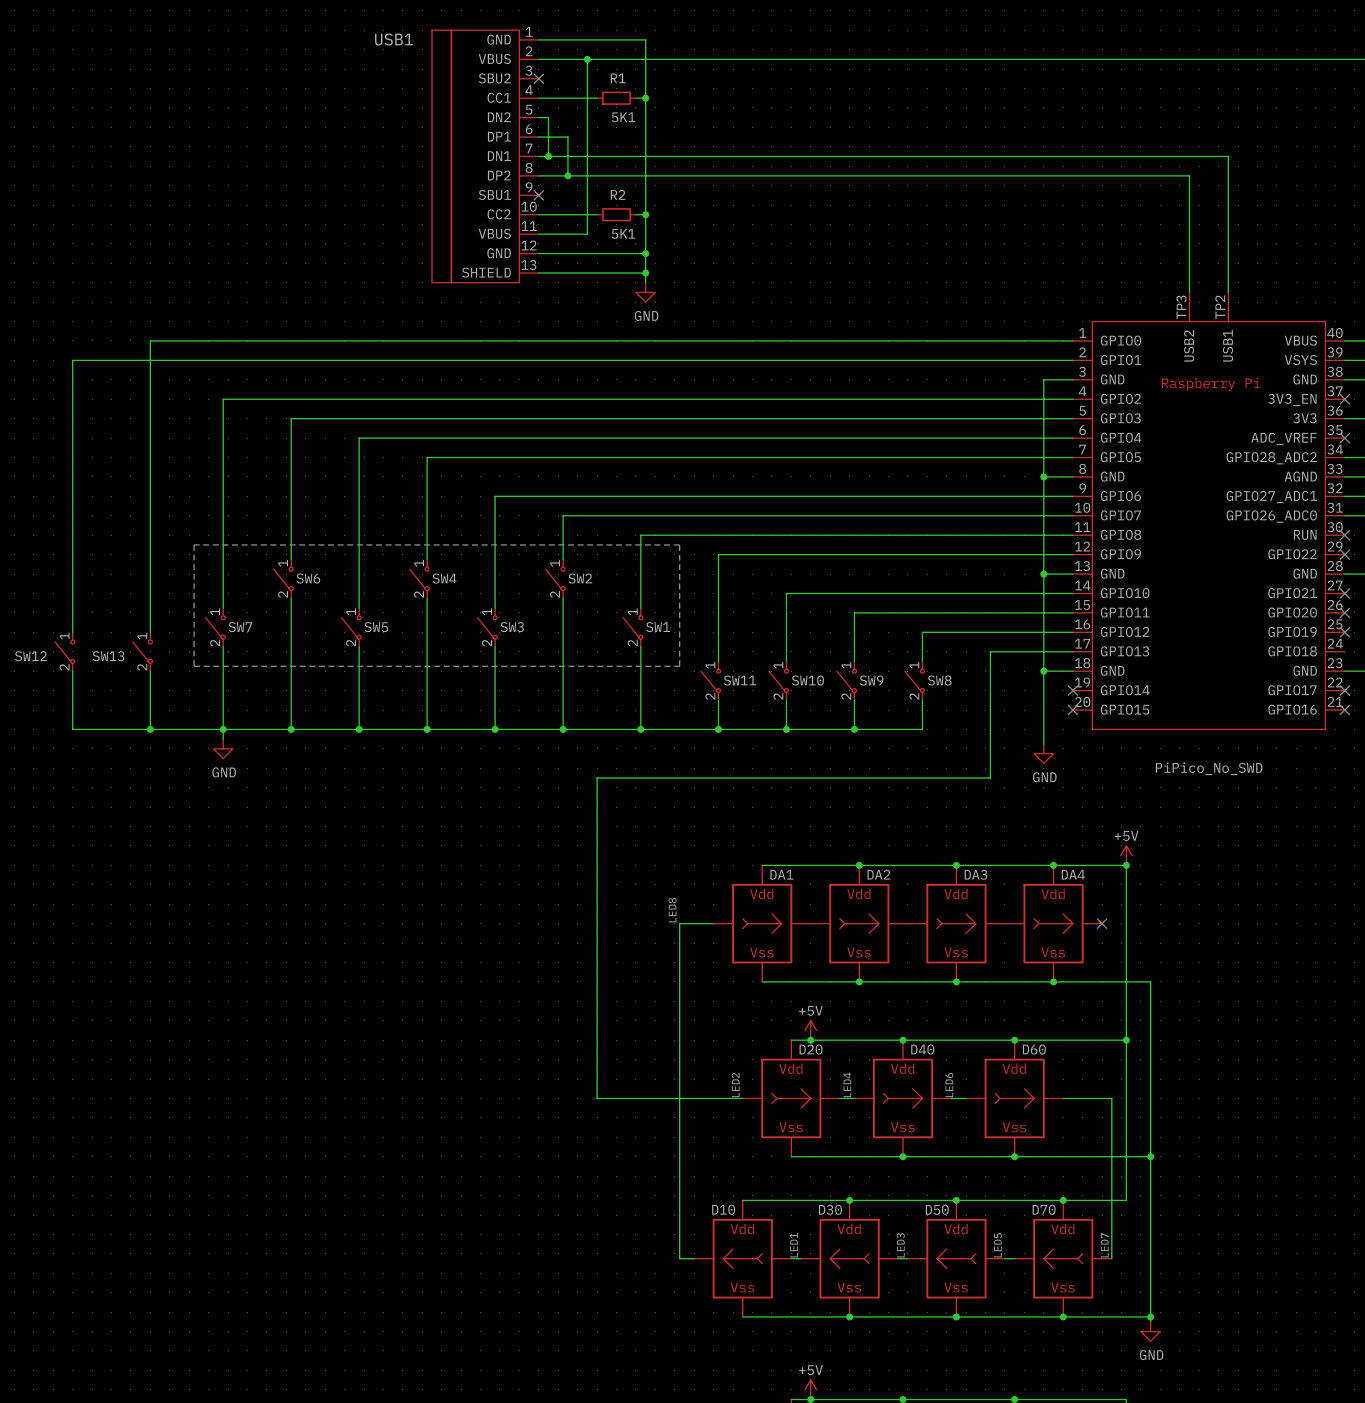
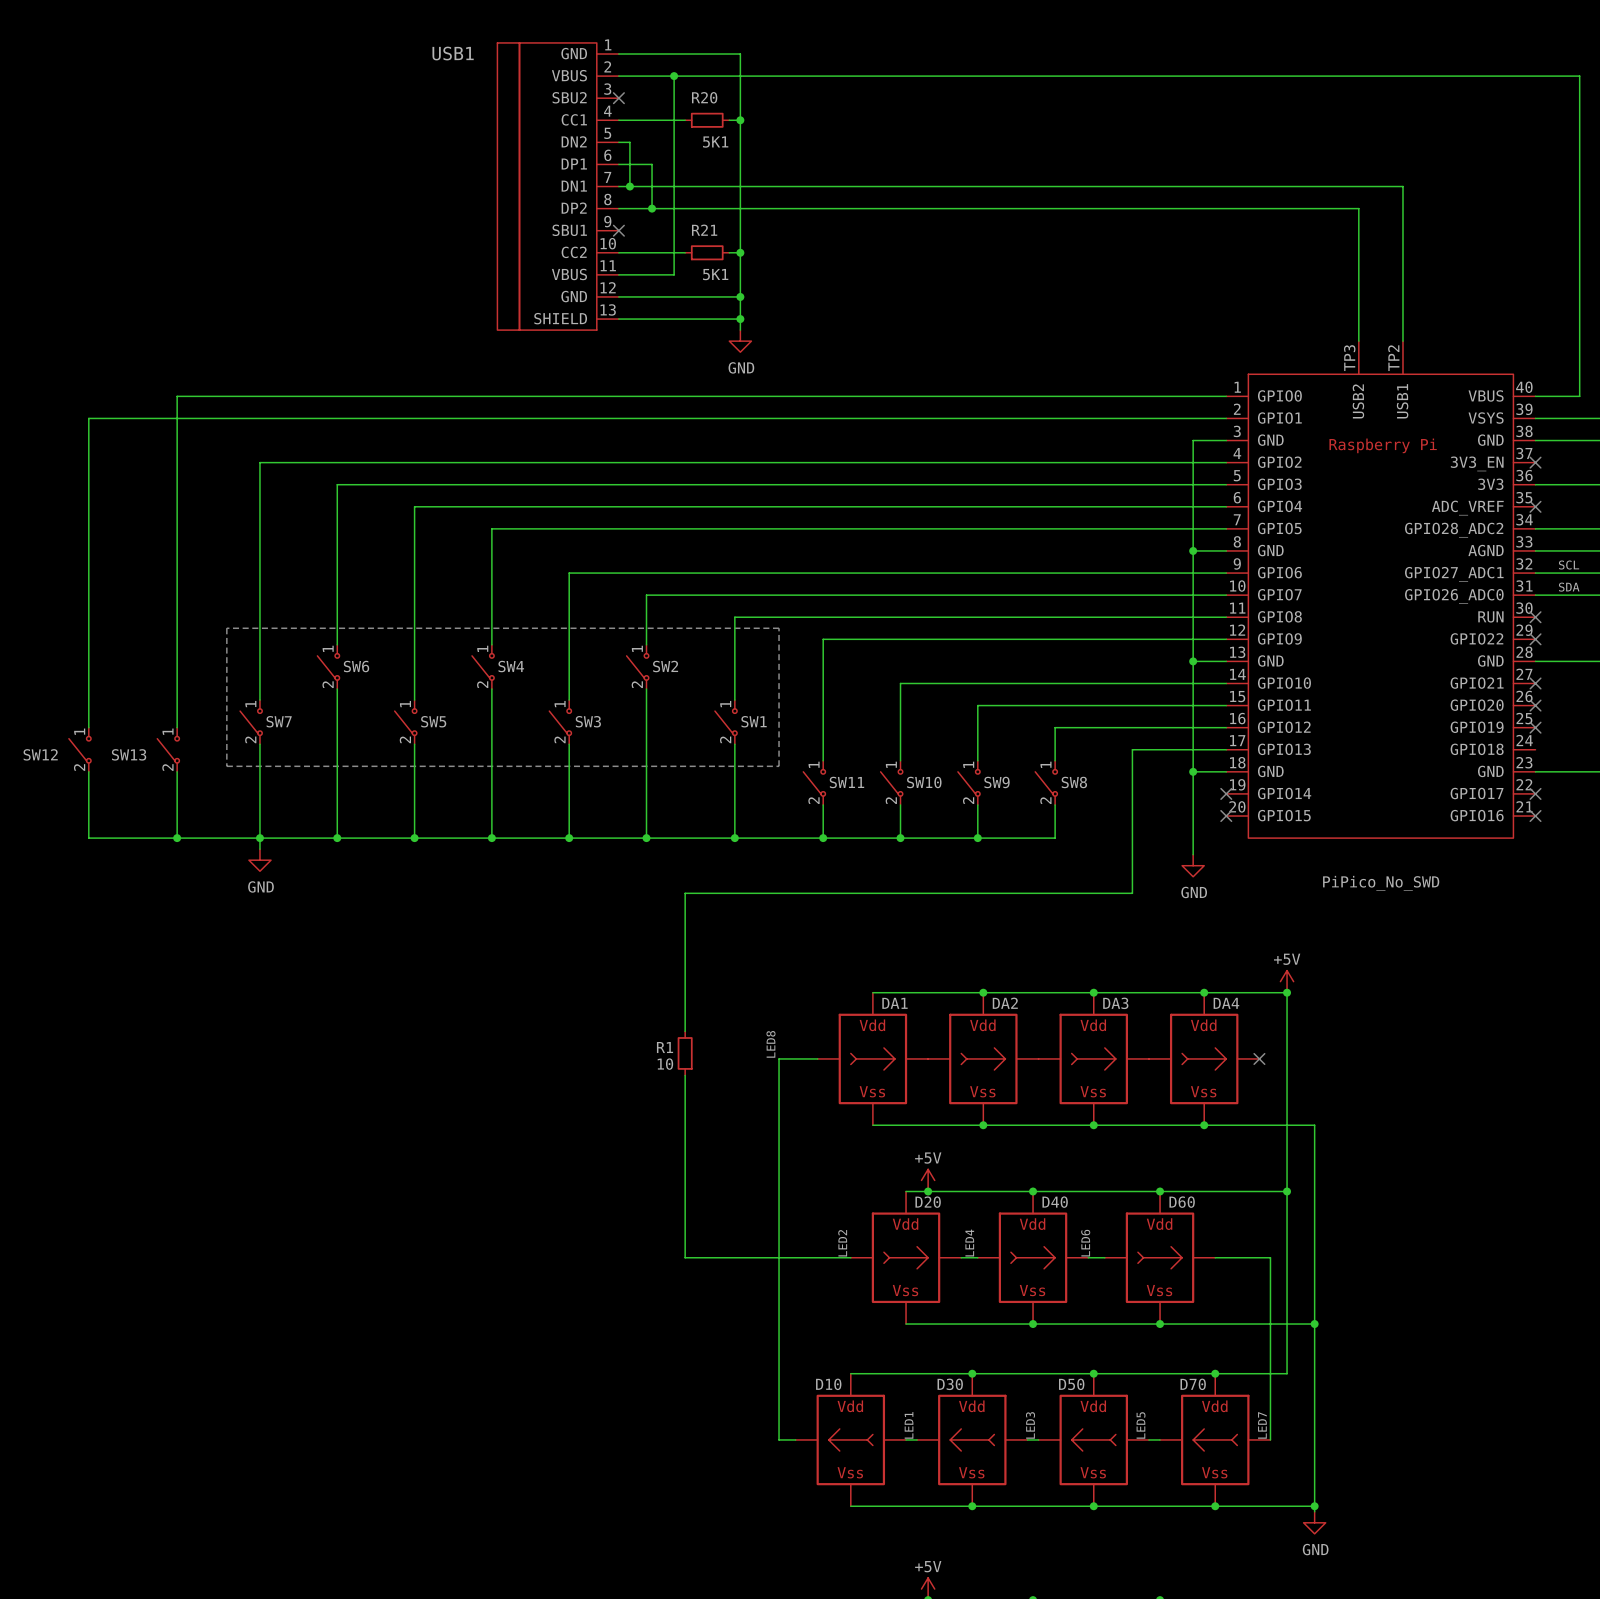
R1 name: R1 (618, 78) -> R20 (704, 97)
R2 name: R2 (618, 194) -> R21 (704, 230)
wire: (597, 899) (597, 938) -> none
R1: none -> 10 (685, 1053)

